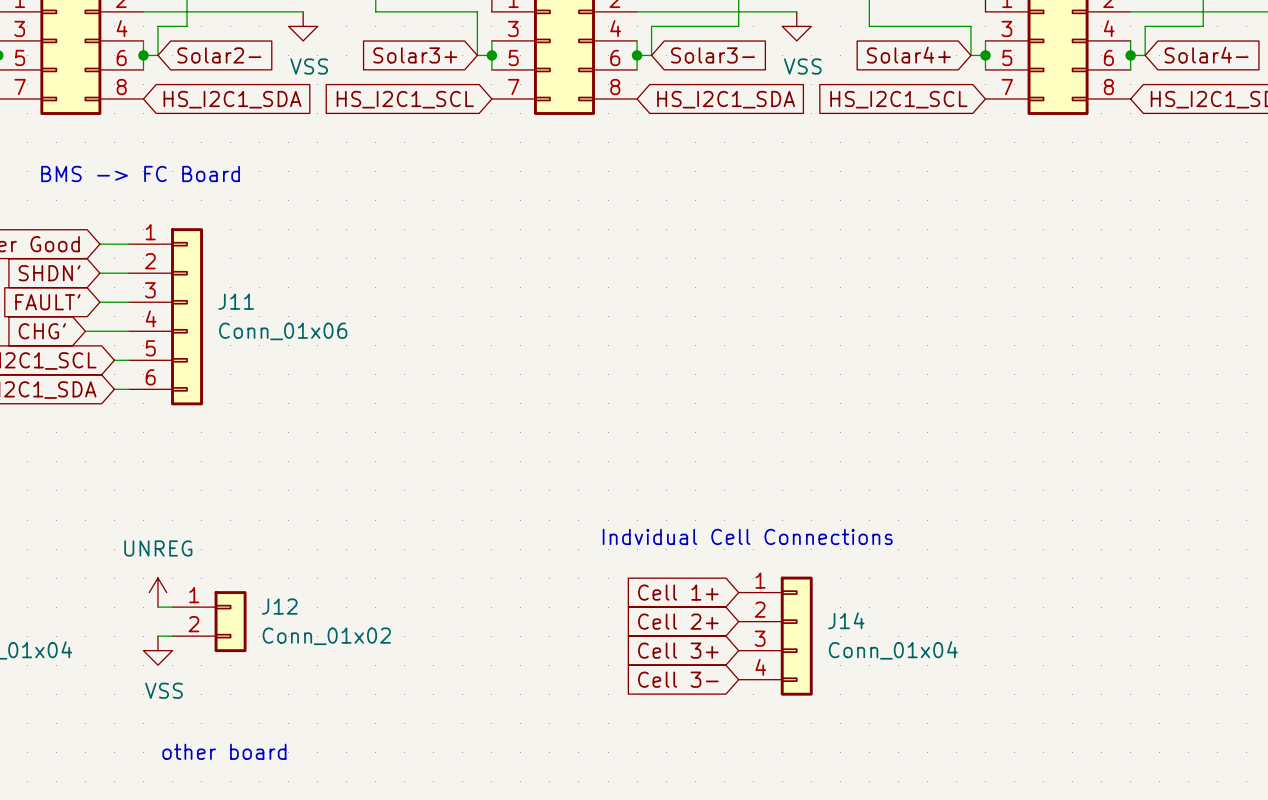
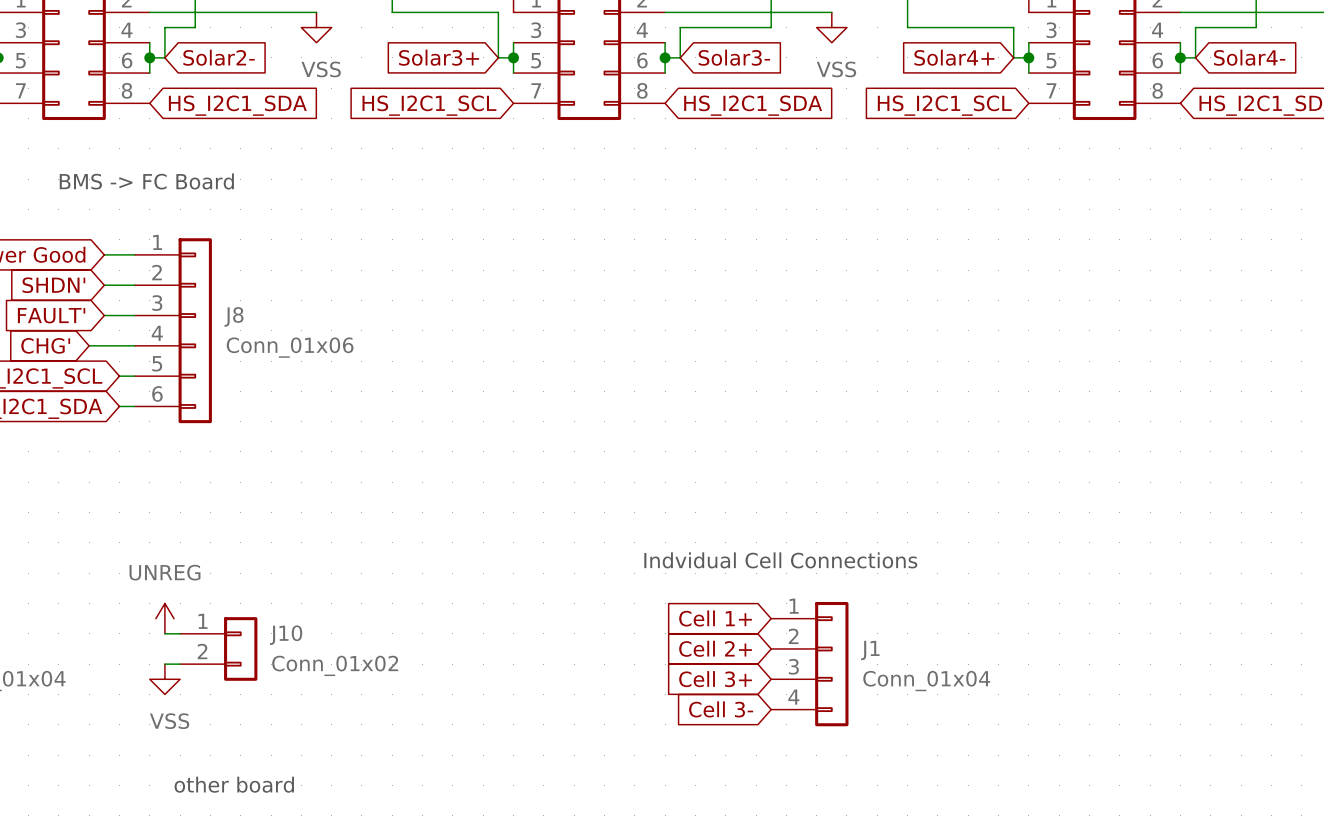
J11 name: J11 (236, 301) -> J8 (233, 316)
J12 name: J12 (279, 606) -> J10 (286, 635)
J14 name: J14 (846, 620) -> J1 (870, 650)

